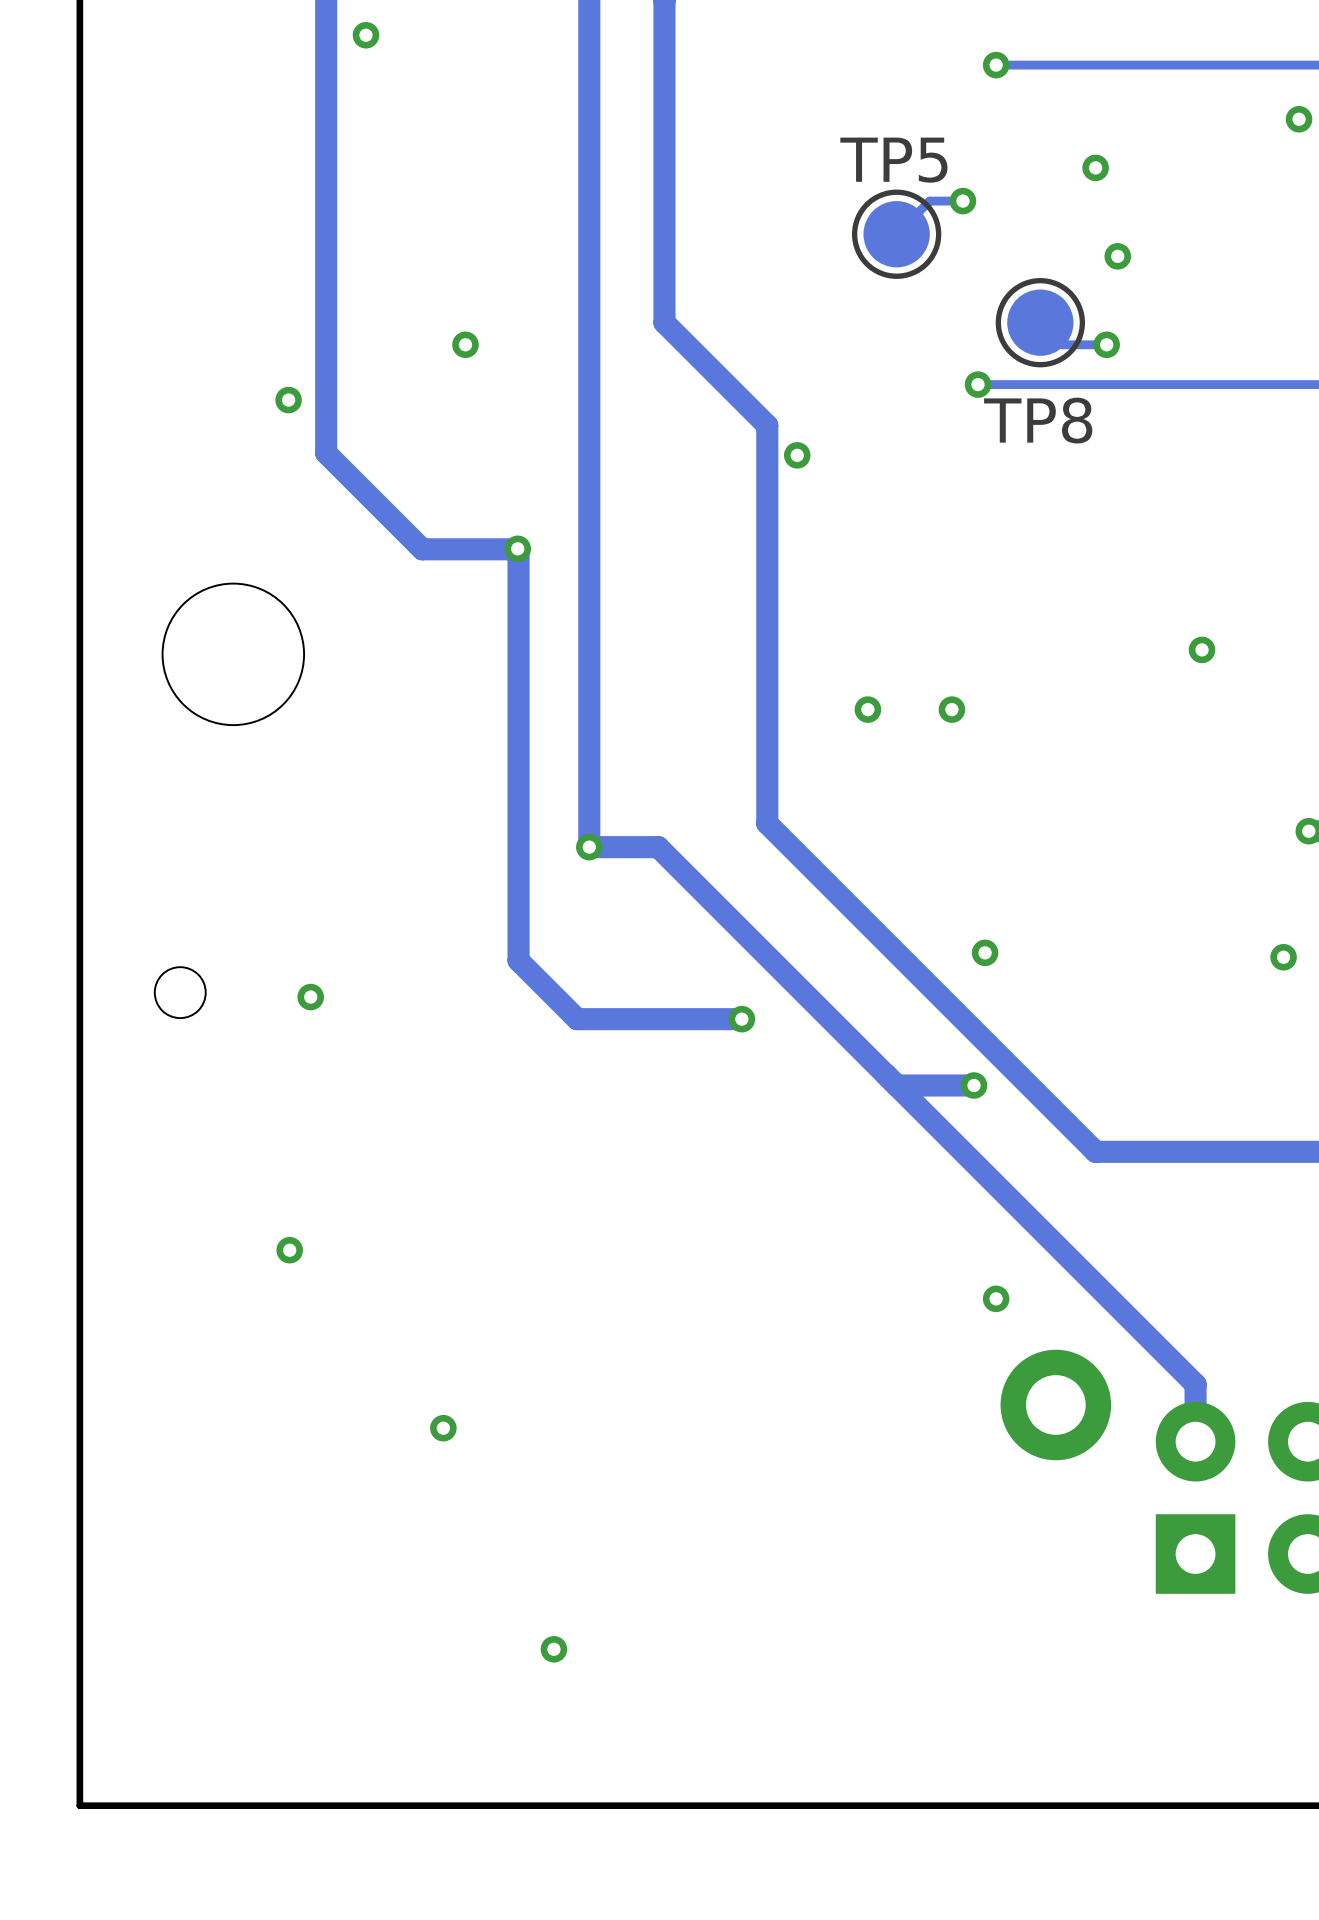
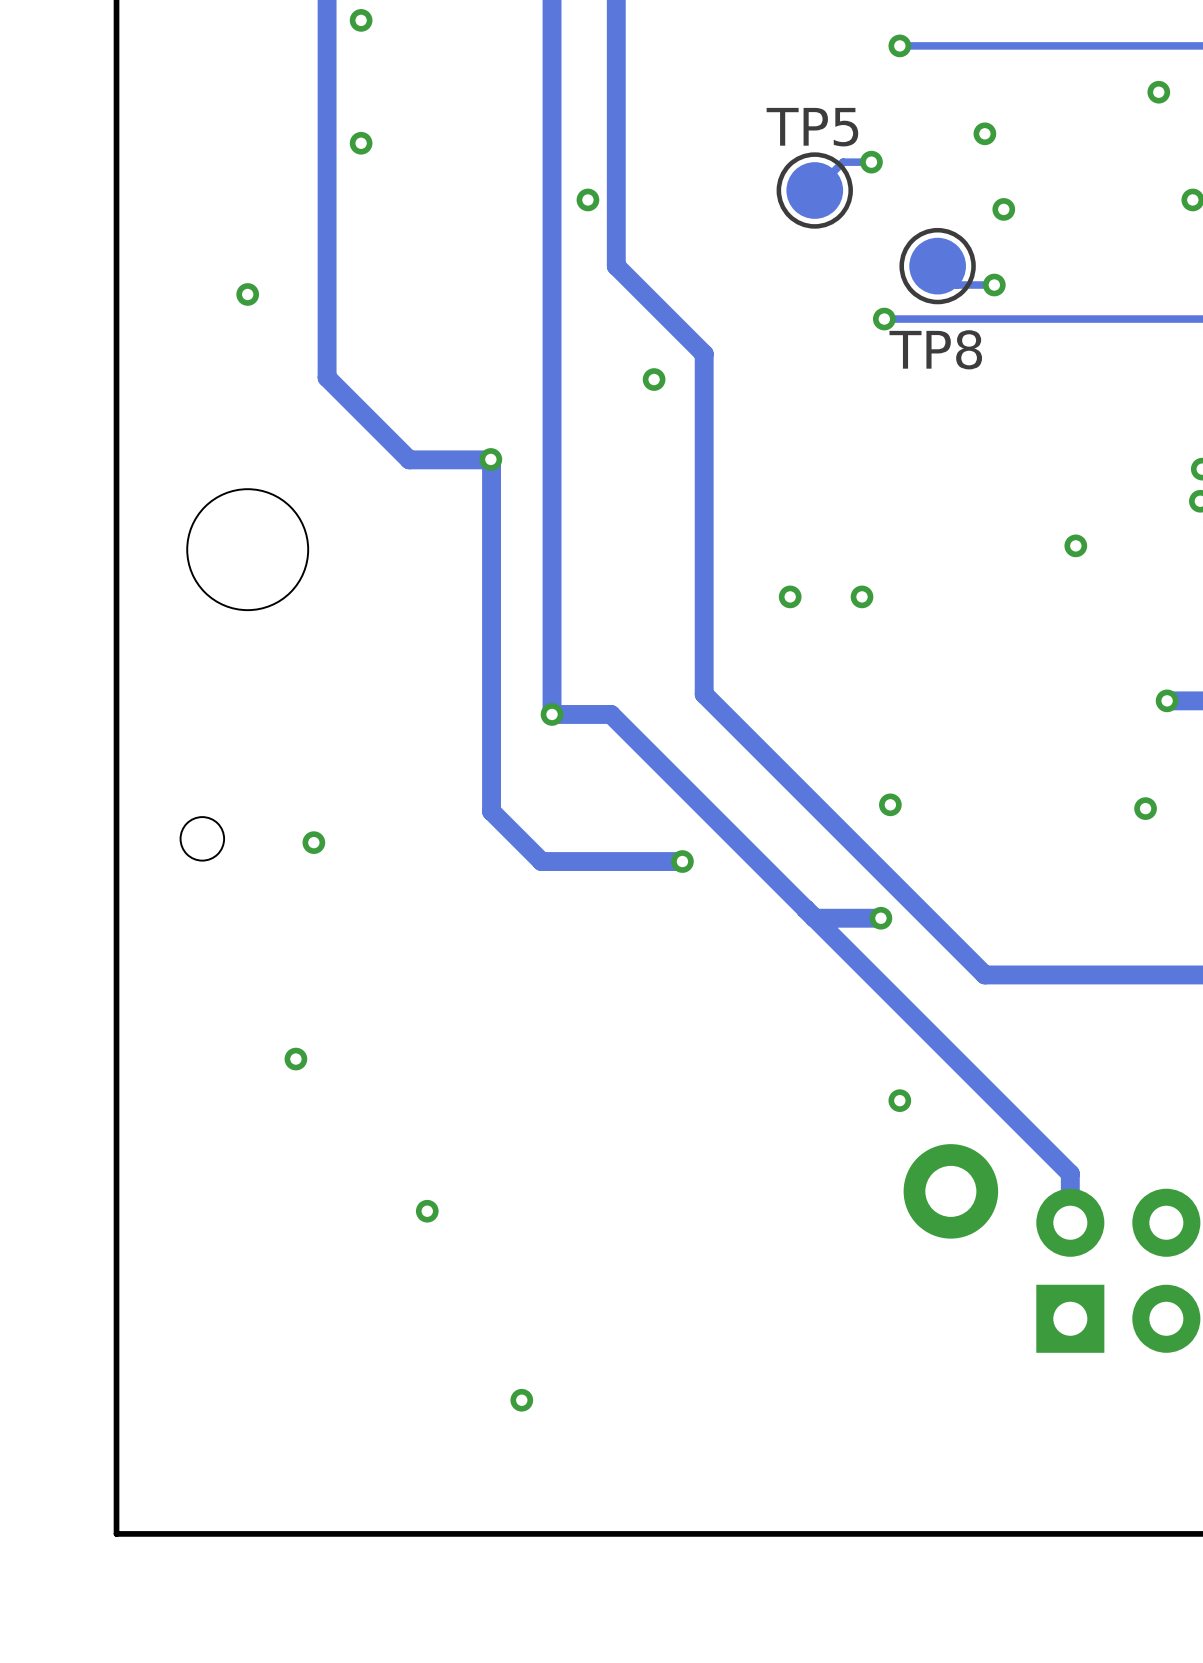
via: none -> (361, 143)
via: none -> (587, 199)
via: (465, 344) -> none
via position: (288, 400) -> (247, 294)
via position: (797, 455) -> (654, 379)

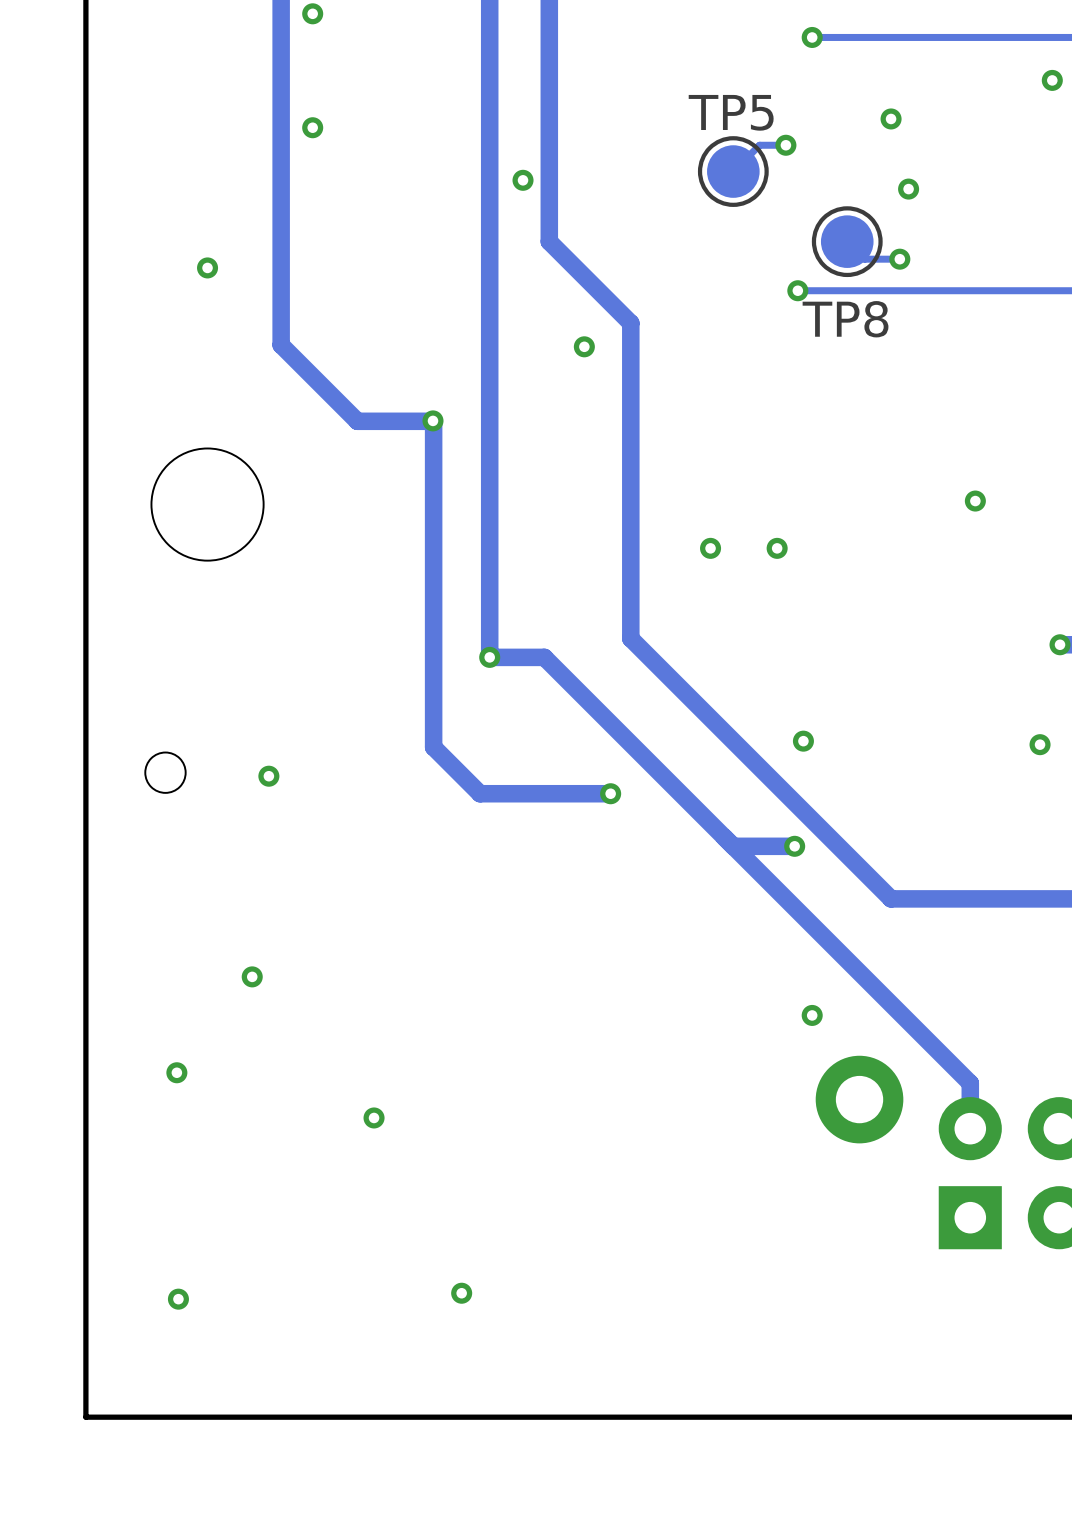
via: none -> (176, 1072)
via: none -> (178, 1299)

